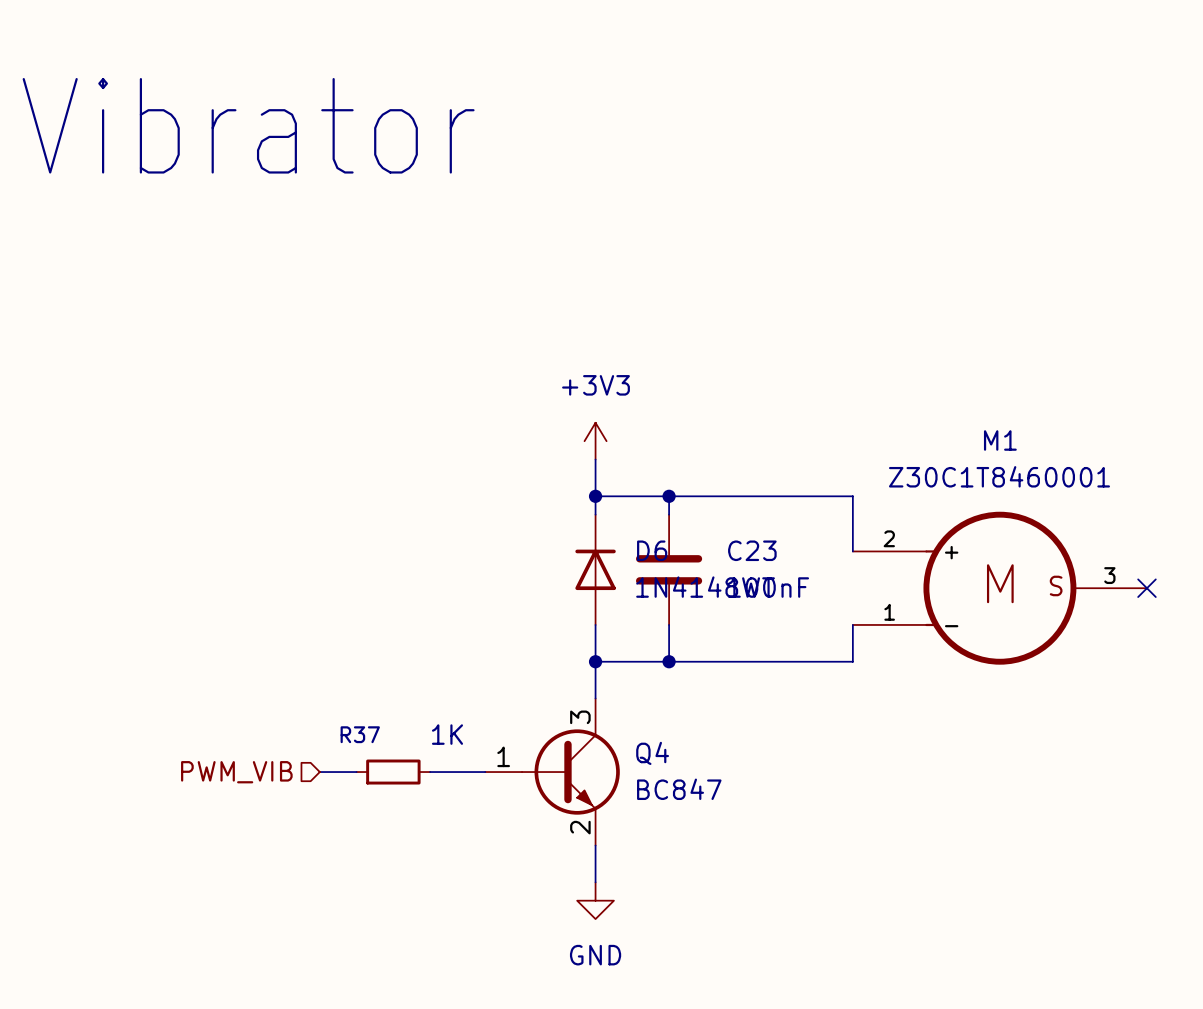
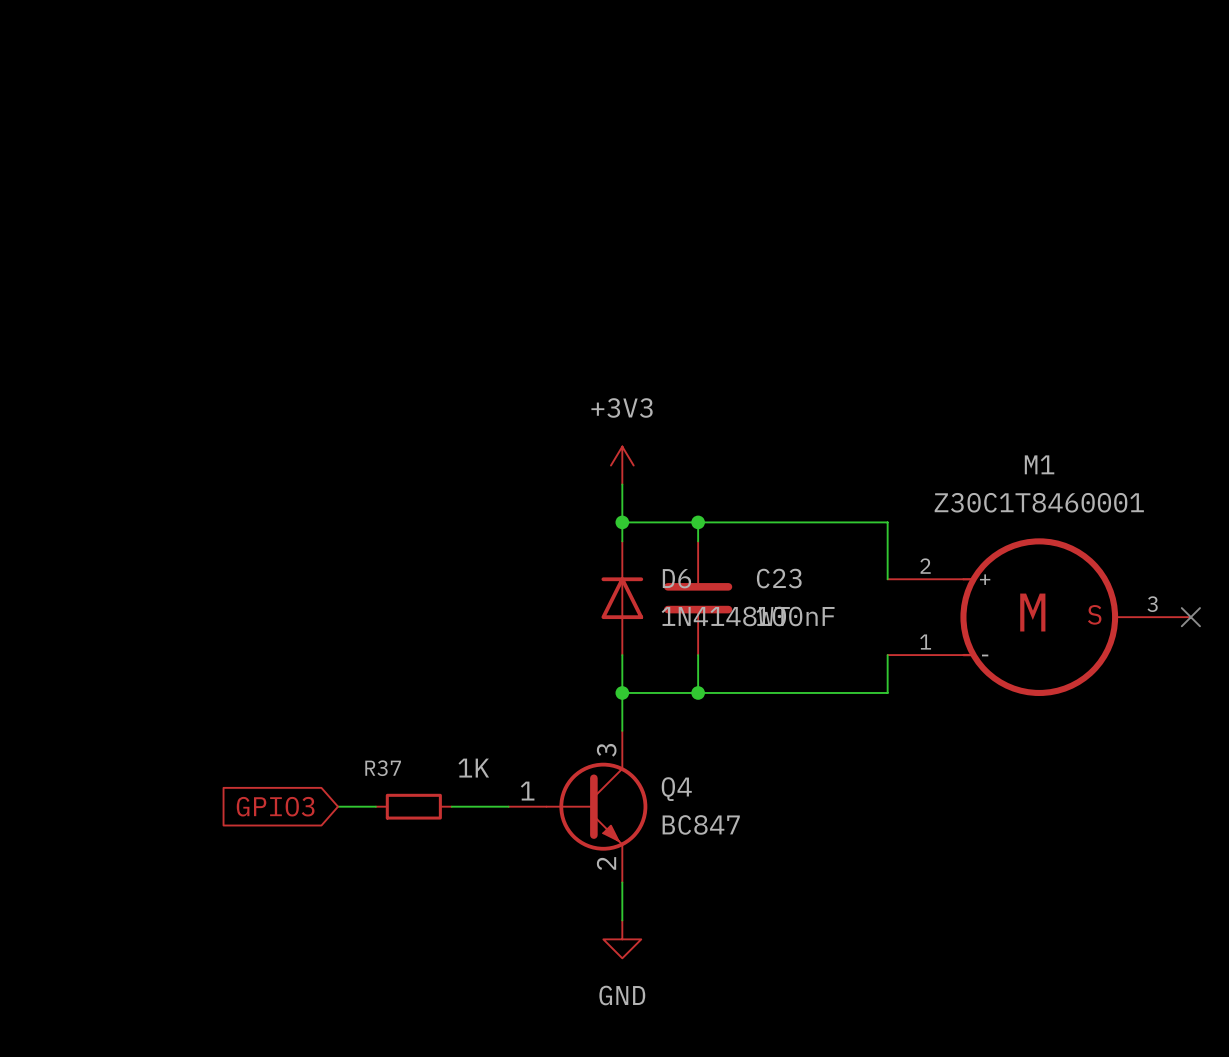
text: Vibrator (248, 125) -> none
hierarchical label: PWM_VIB (236, 772) -> none
global label: none -> GPIO3 (275, 806)

